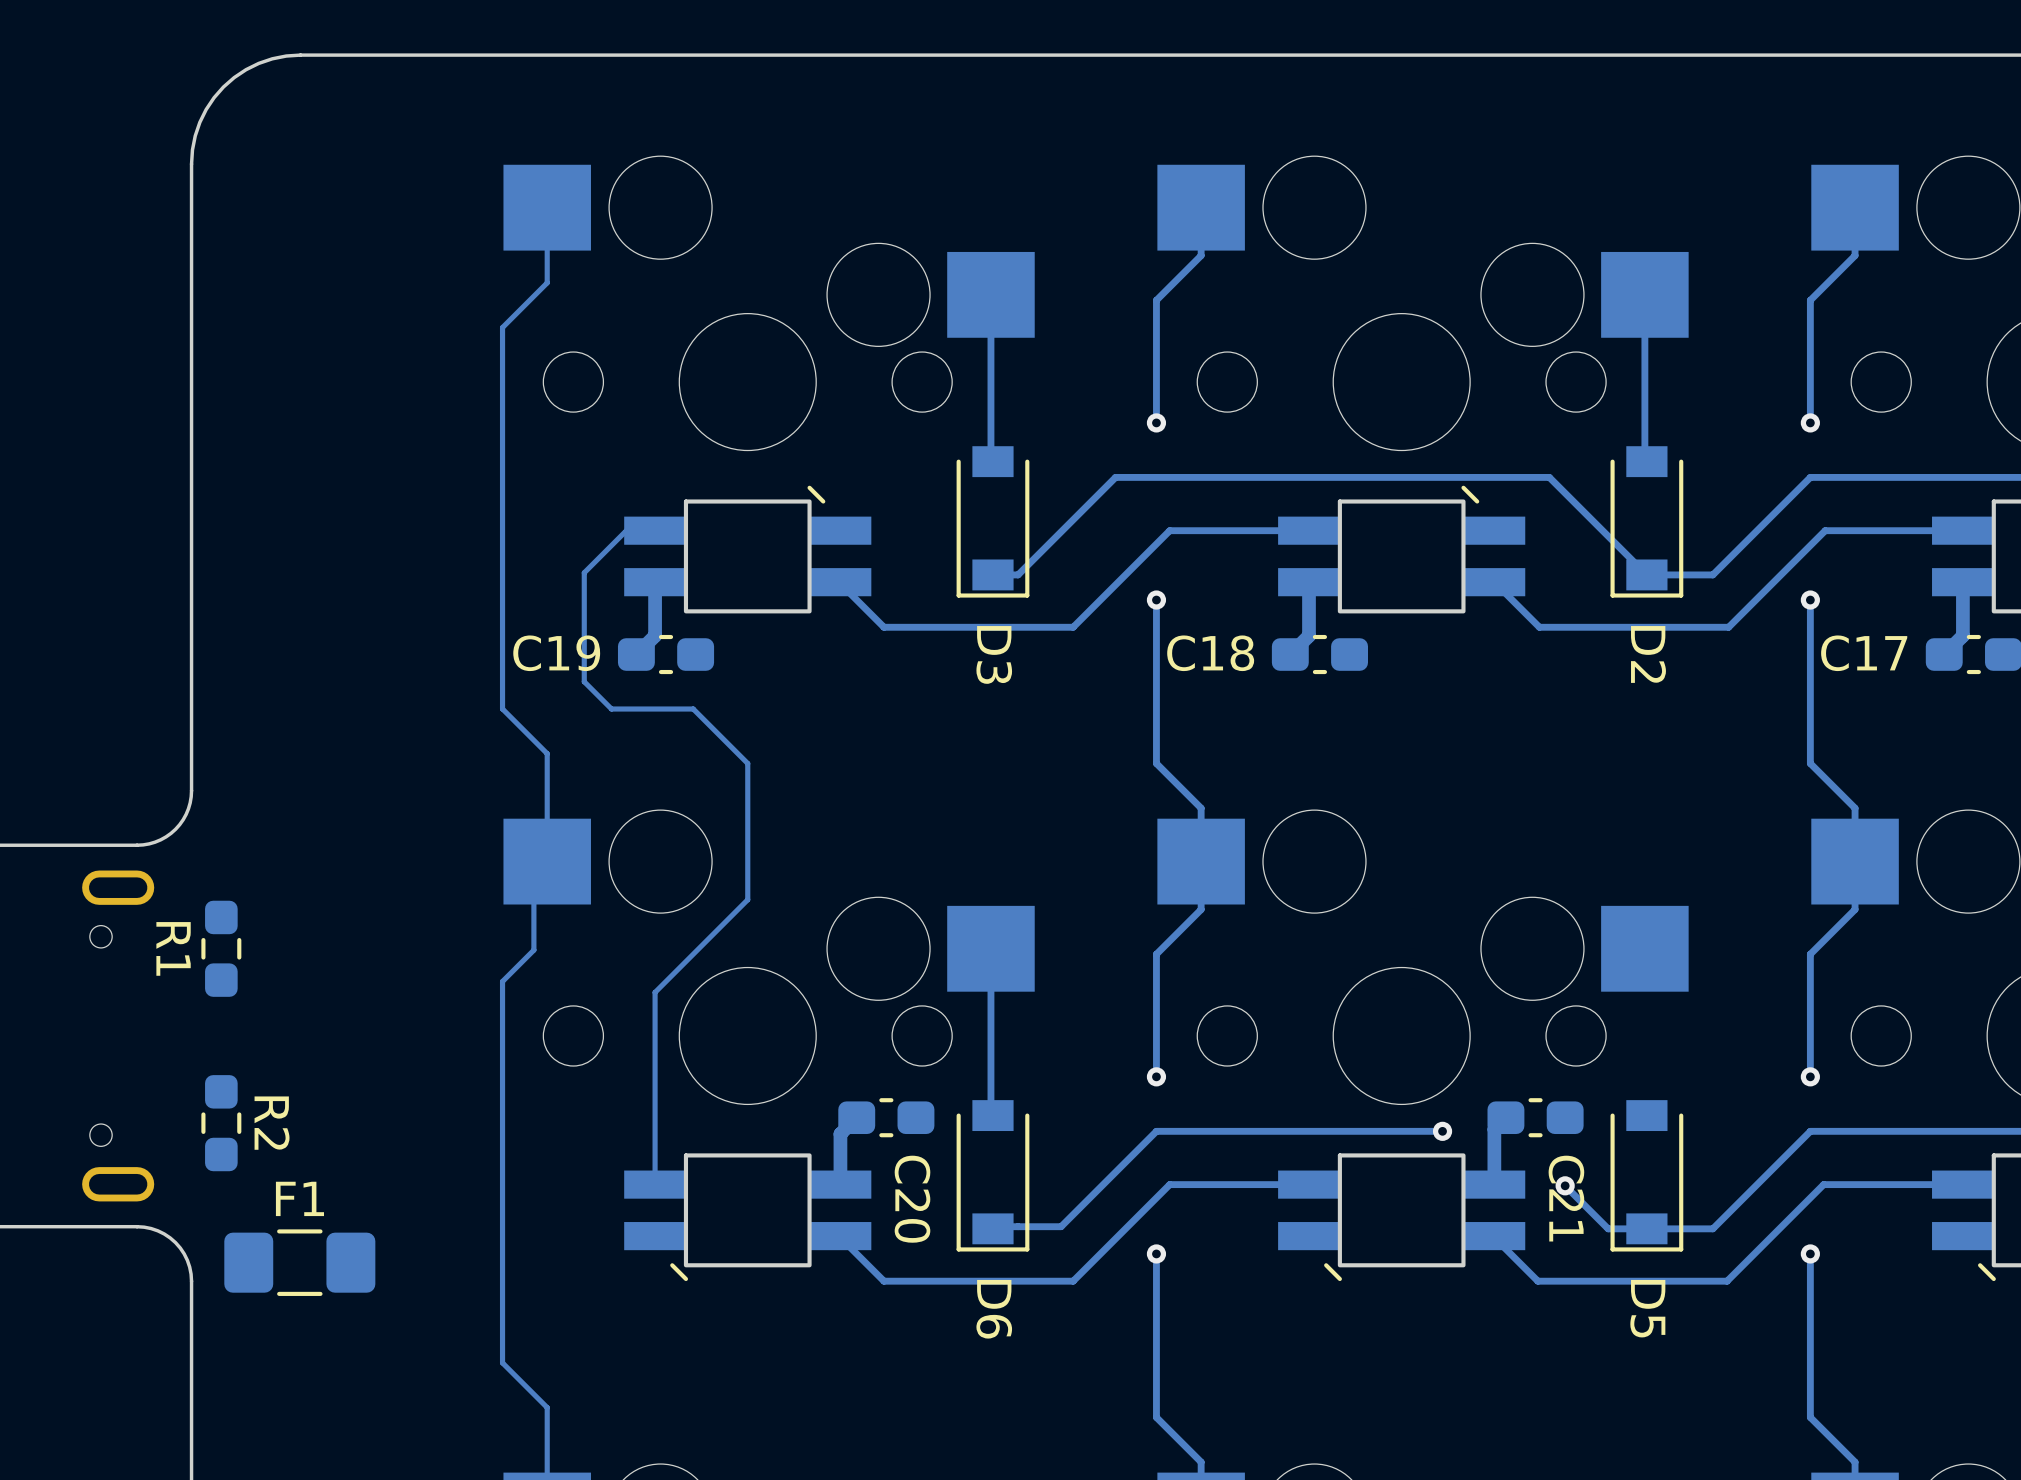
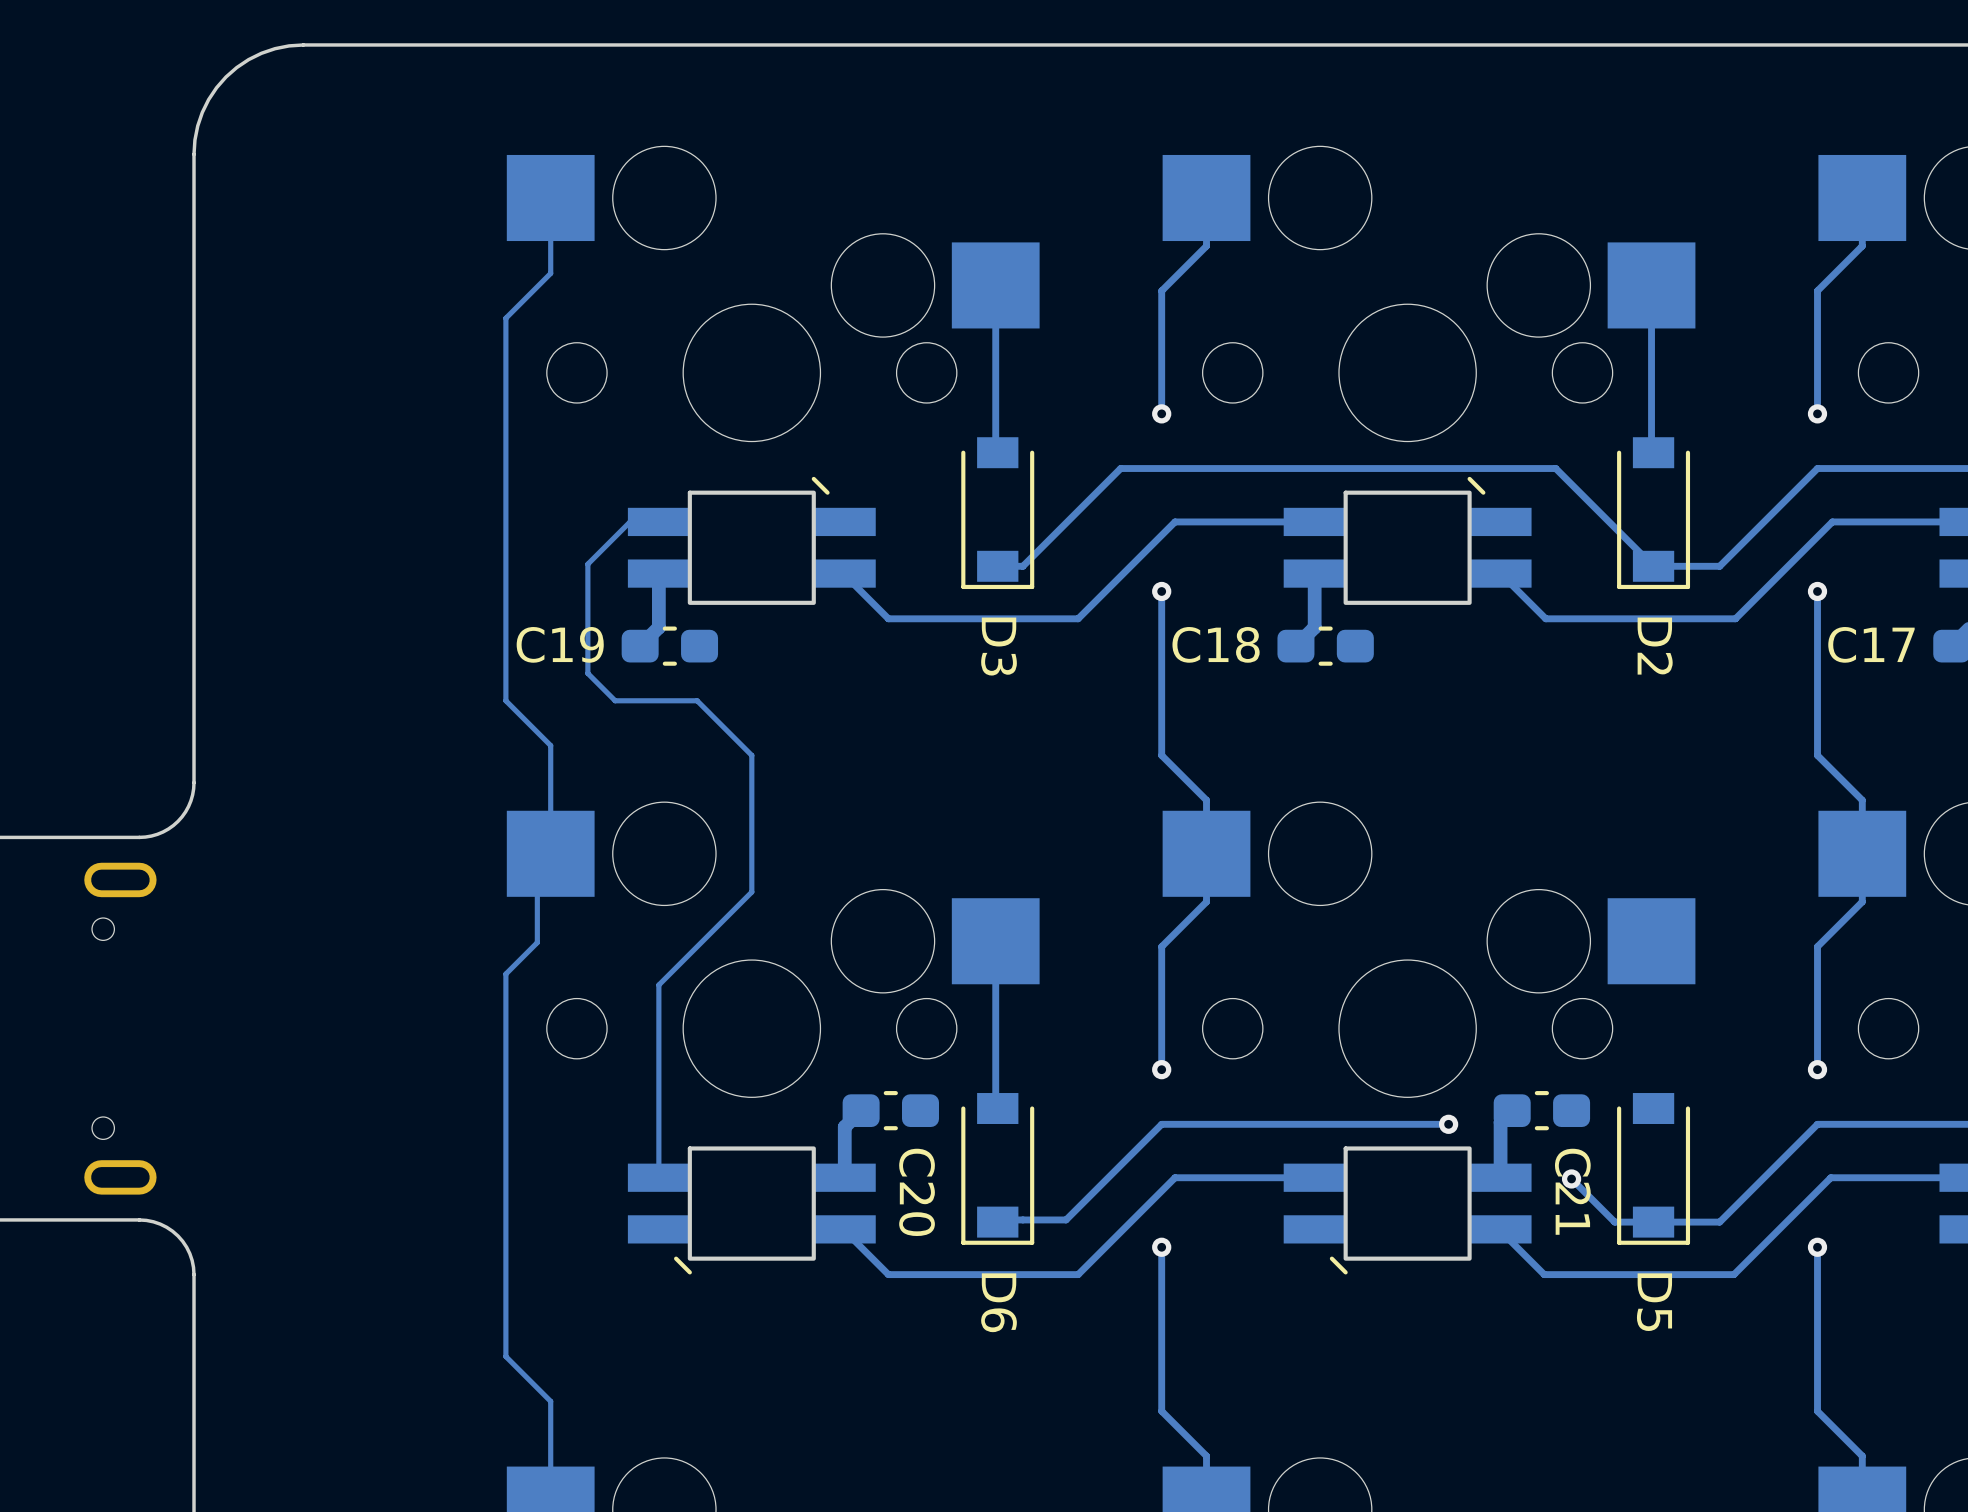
R1: (221, 948) -> none
R2: (221, 1123) -> none
F1: (299, 1262) -> none

